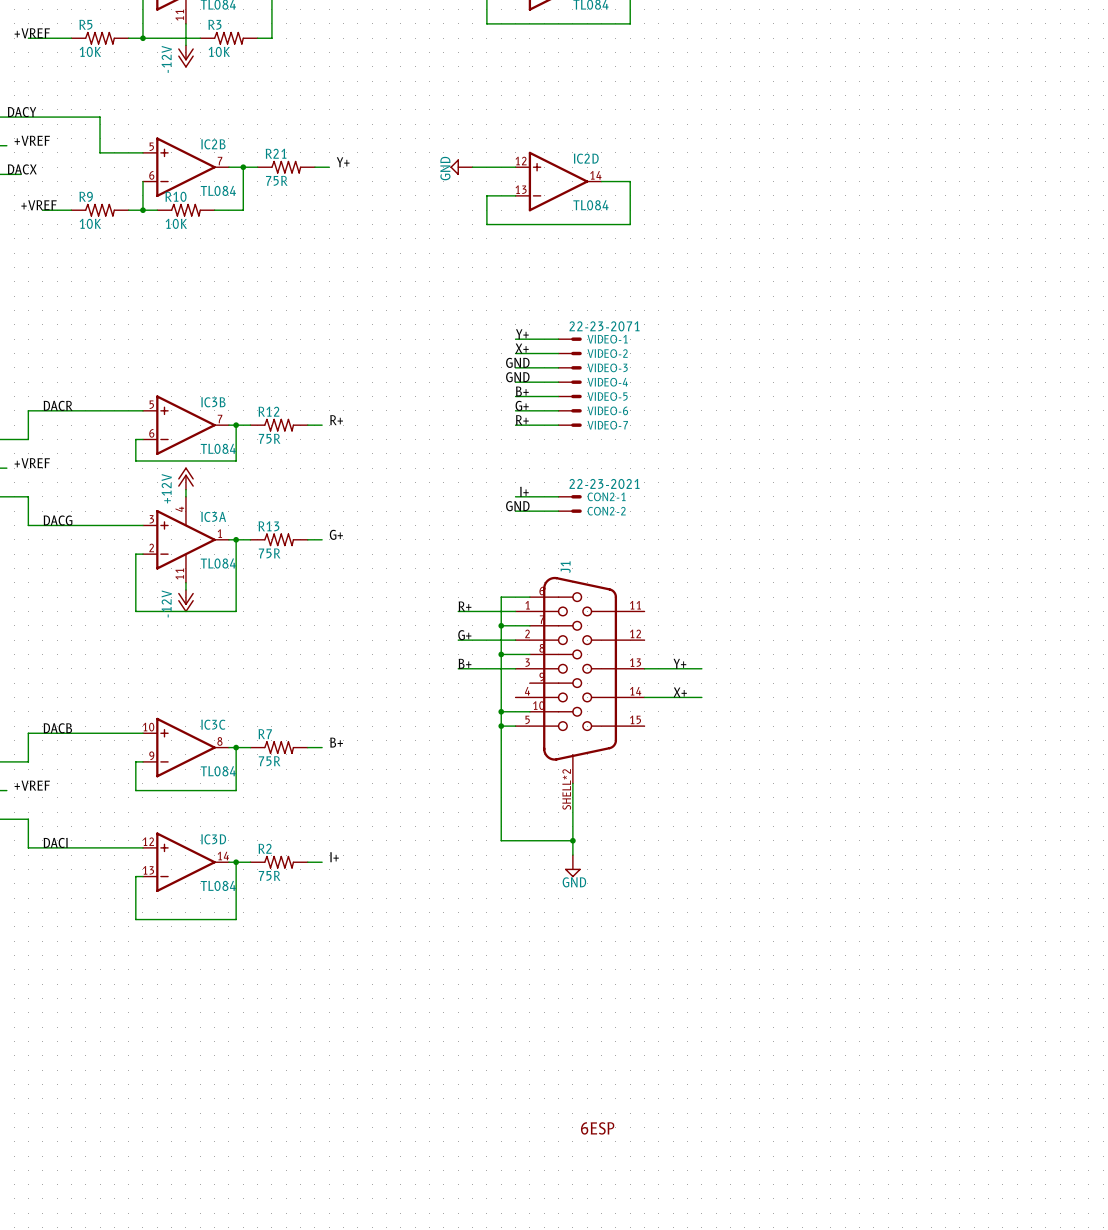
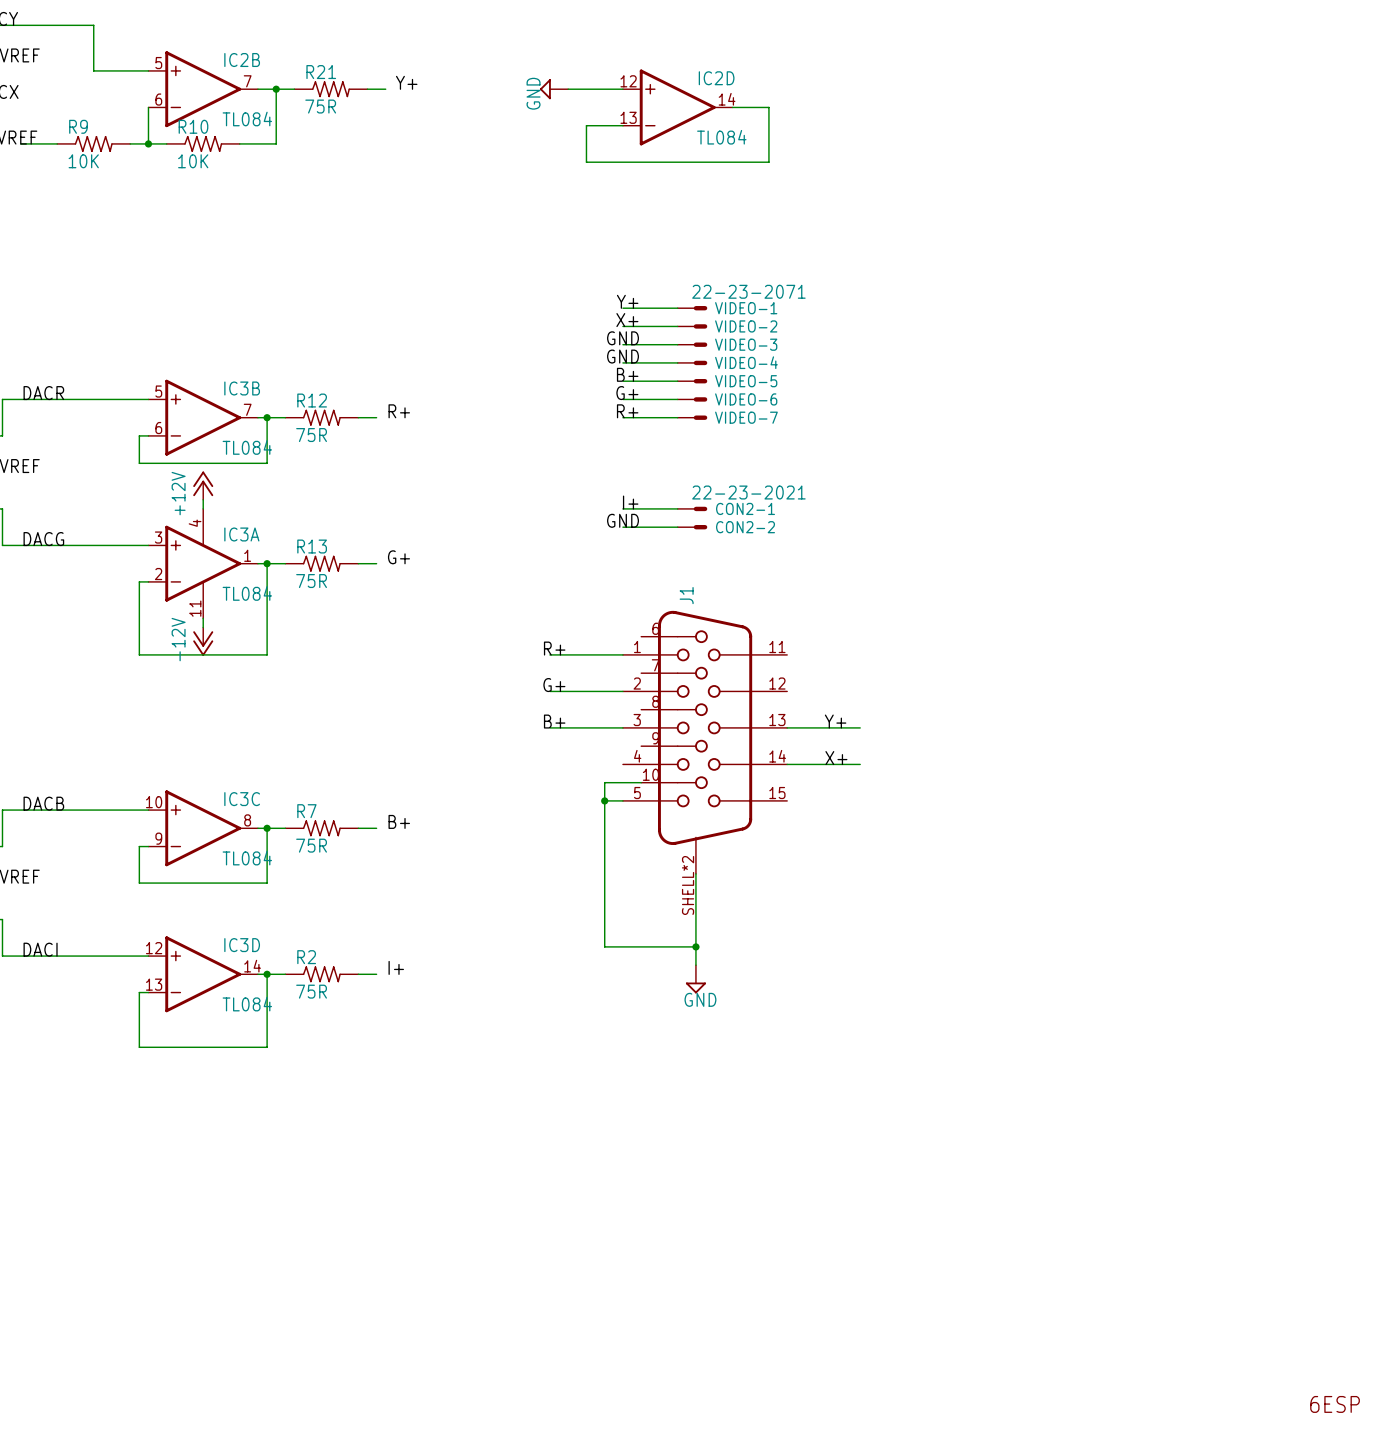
wire: (529, 597) (501, 597) (501, 711) -> none
wire: (501, 625) (529, 625) -> none
junction: (501, 625) -> none
wire: (501, 654) (529, 654) -> none
junction: (501, 654) -> none
junction: (501, 711) -> none
text: 6ESP (597, 1128) -> none
text: none -> 6ESP (1335, 1404)

